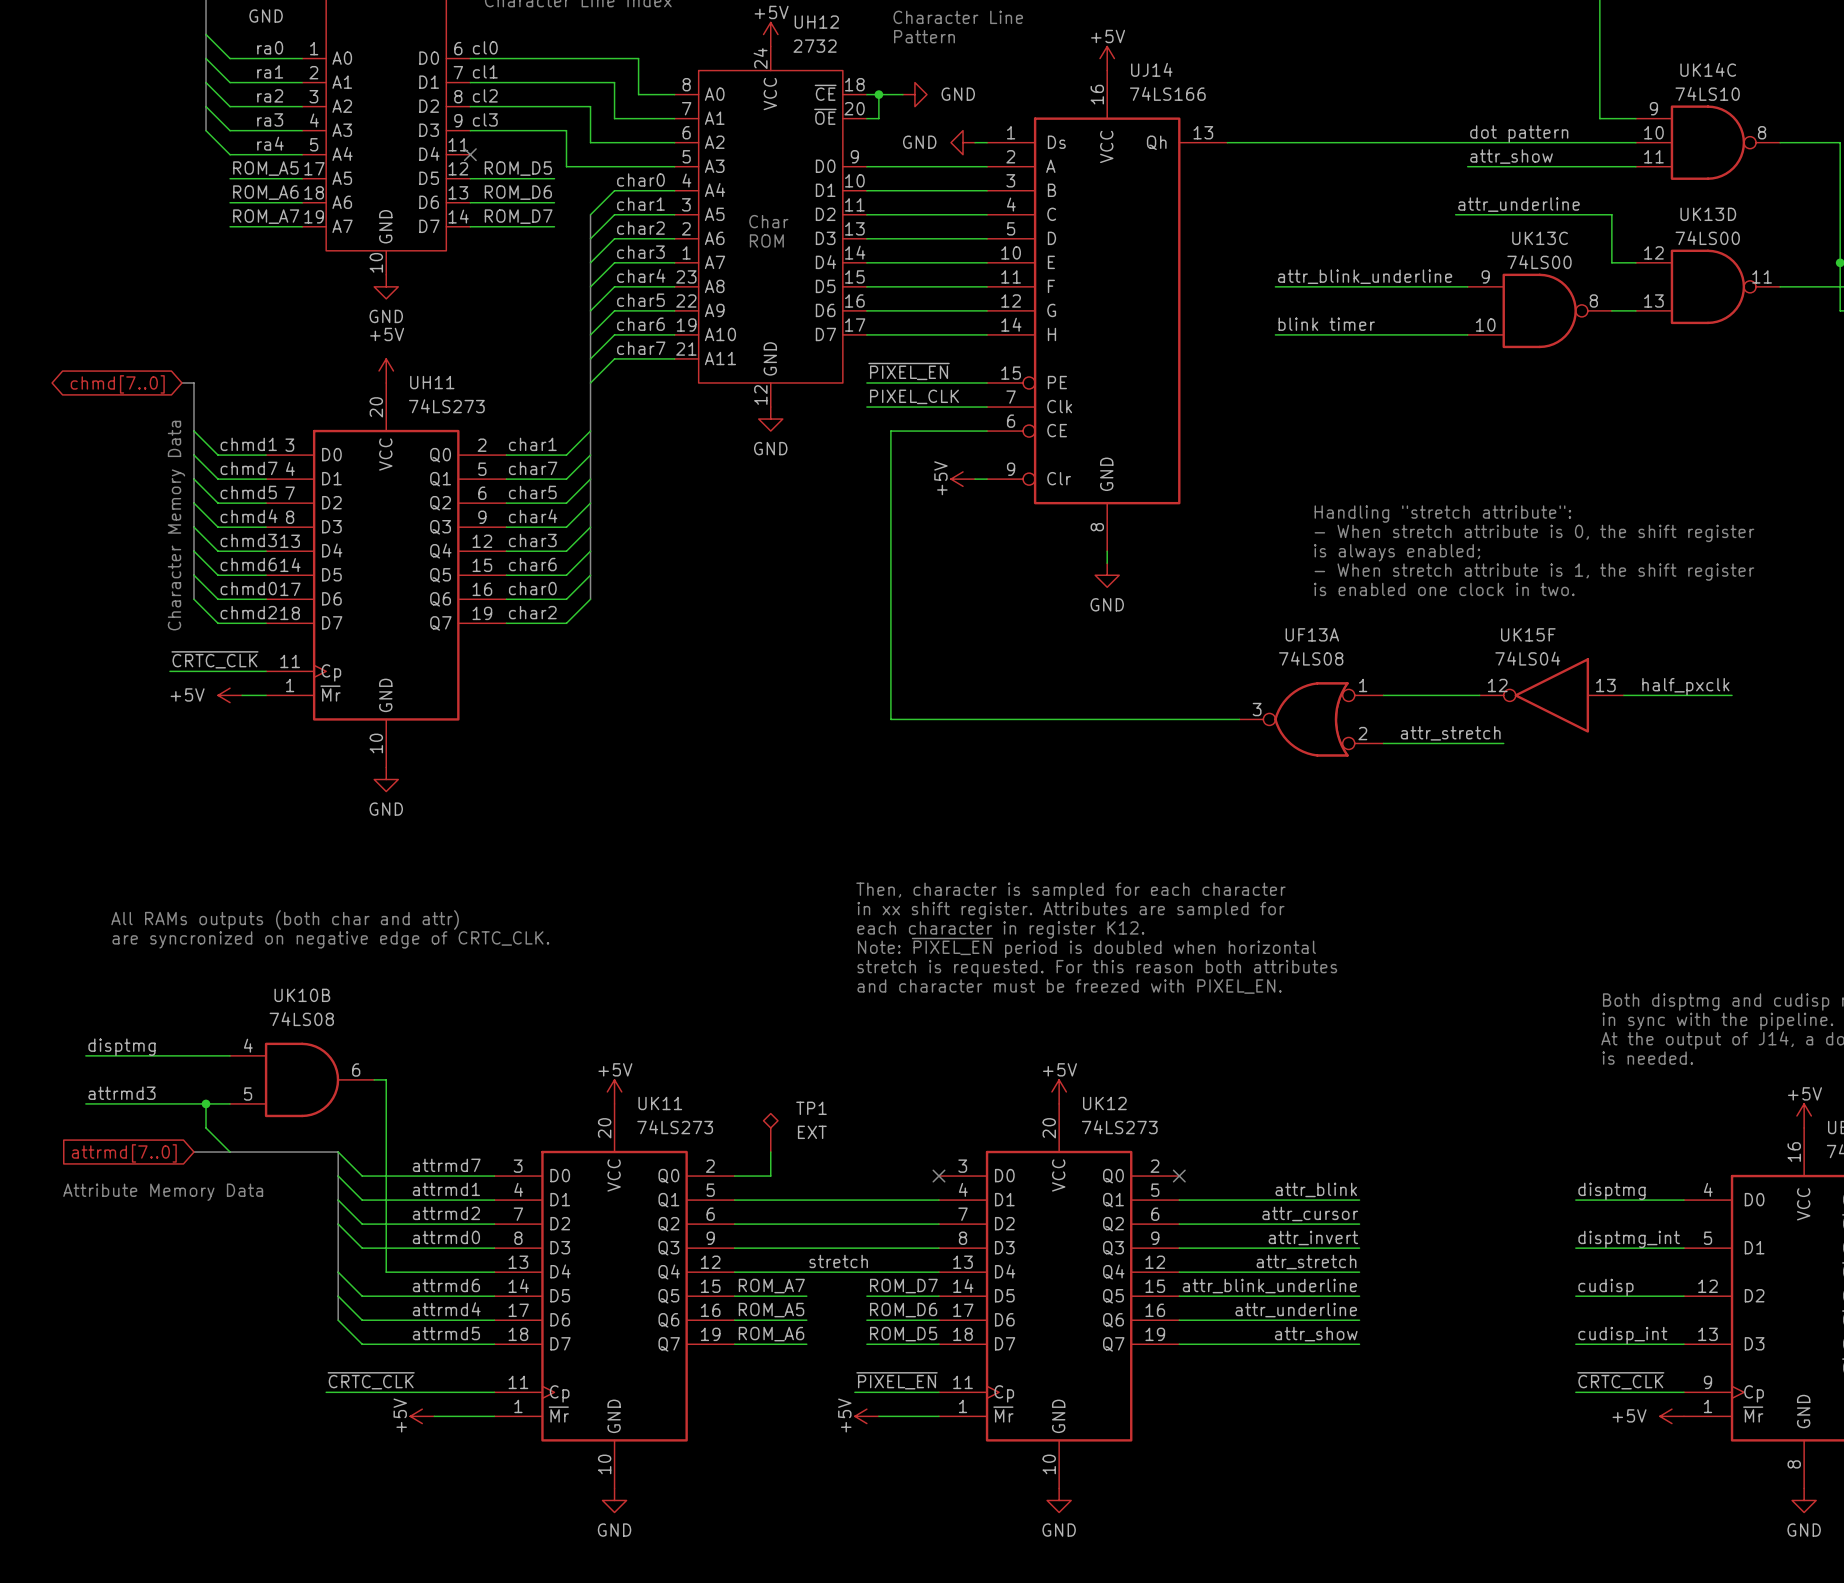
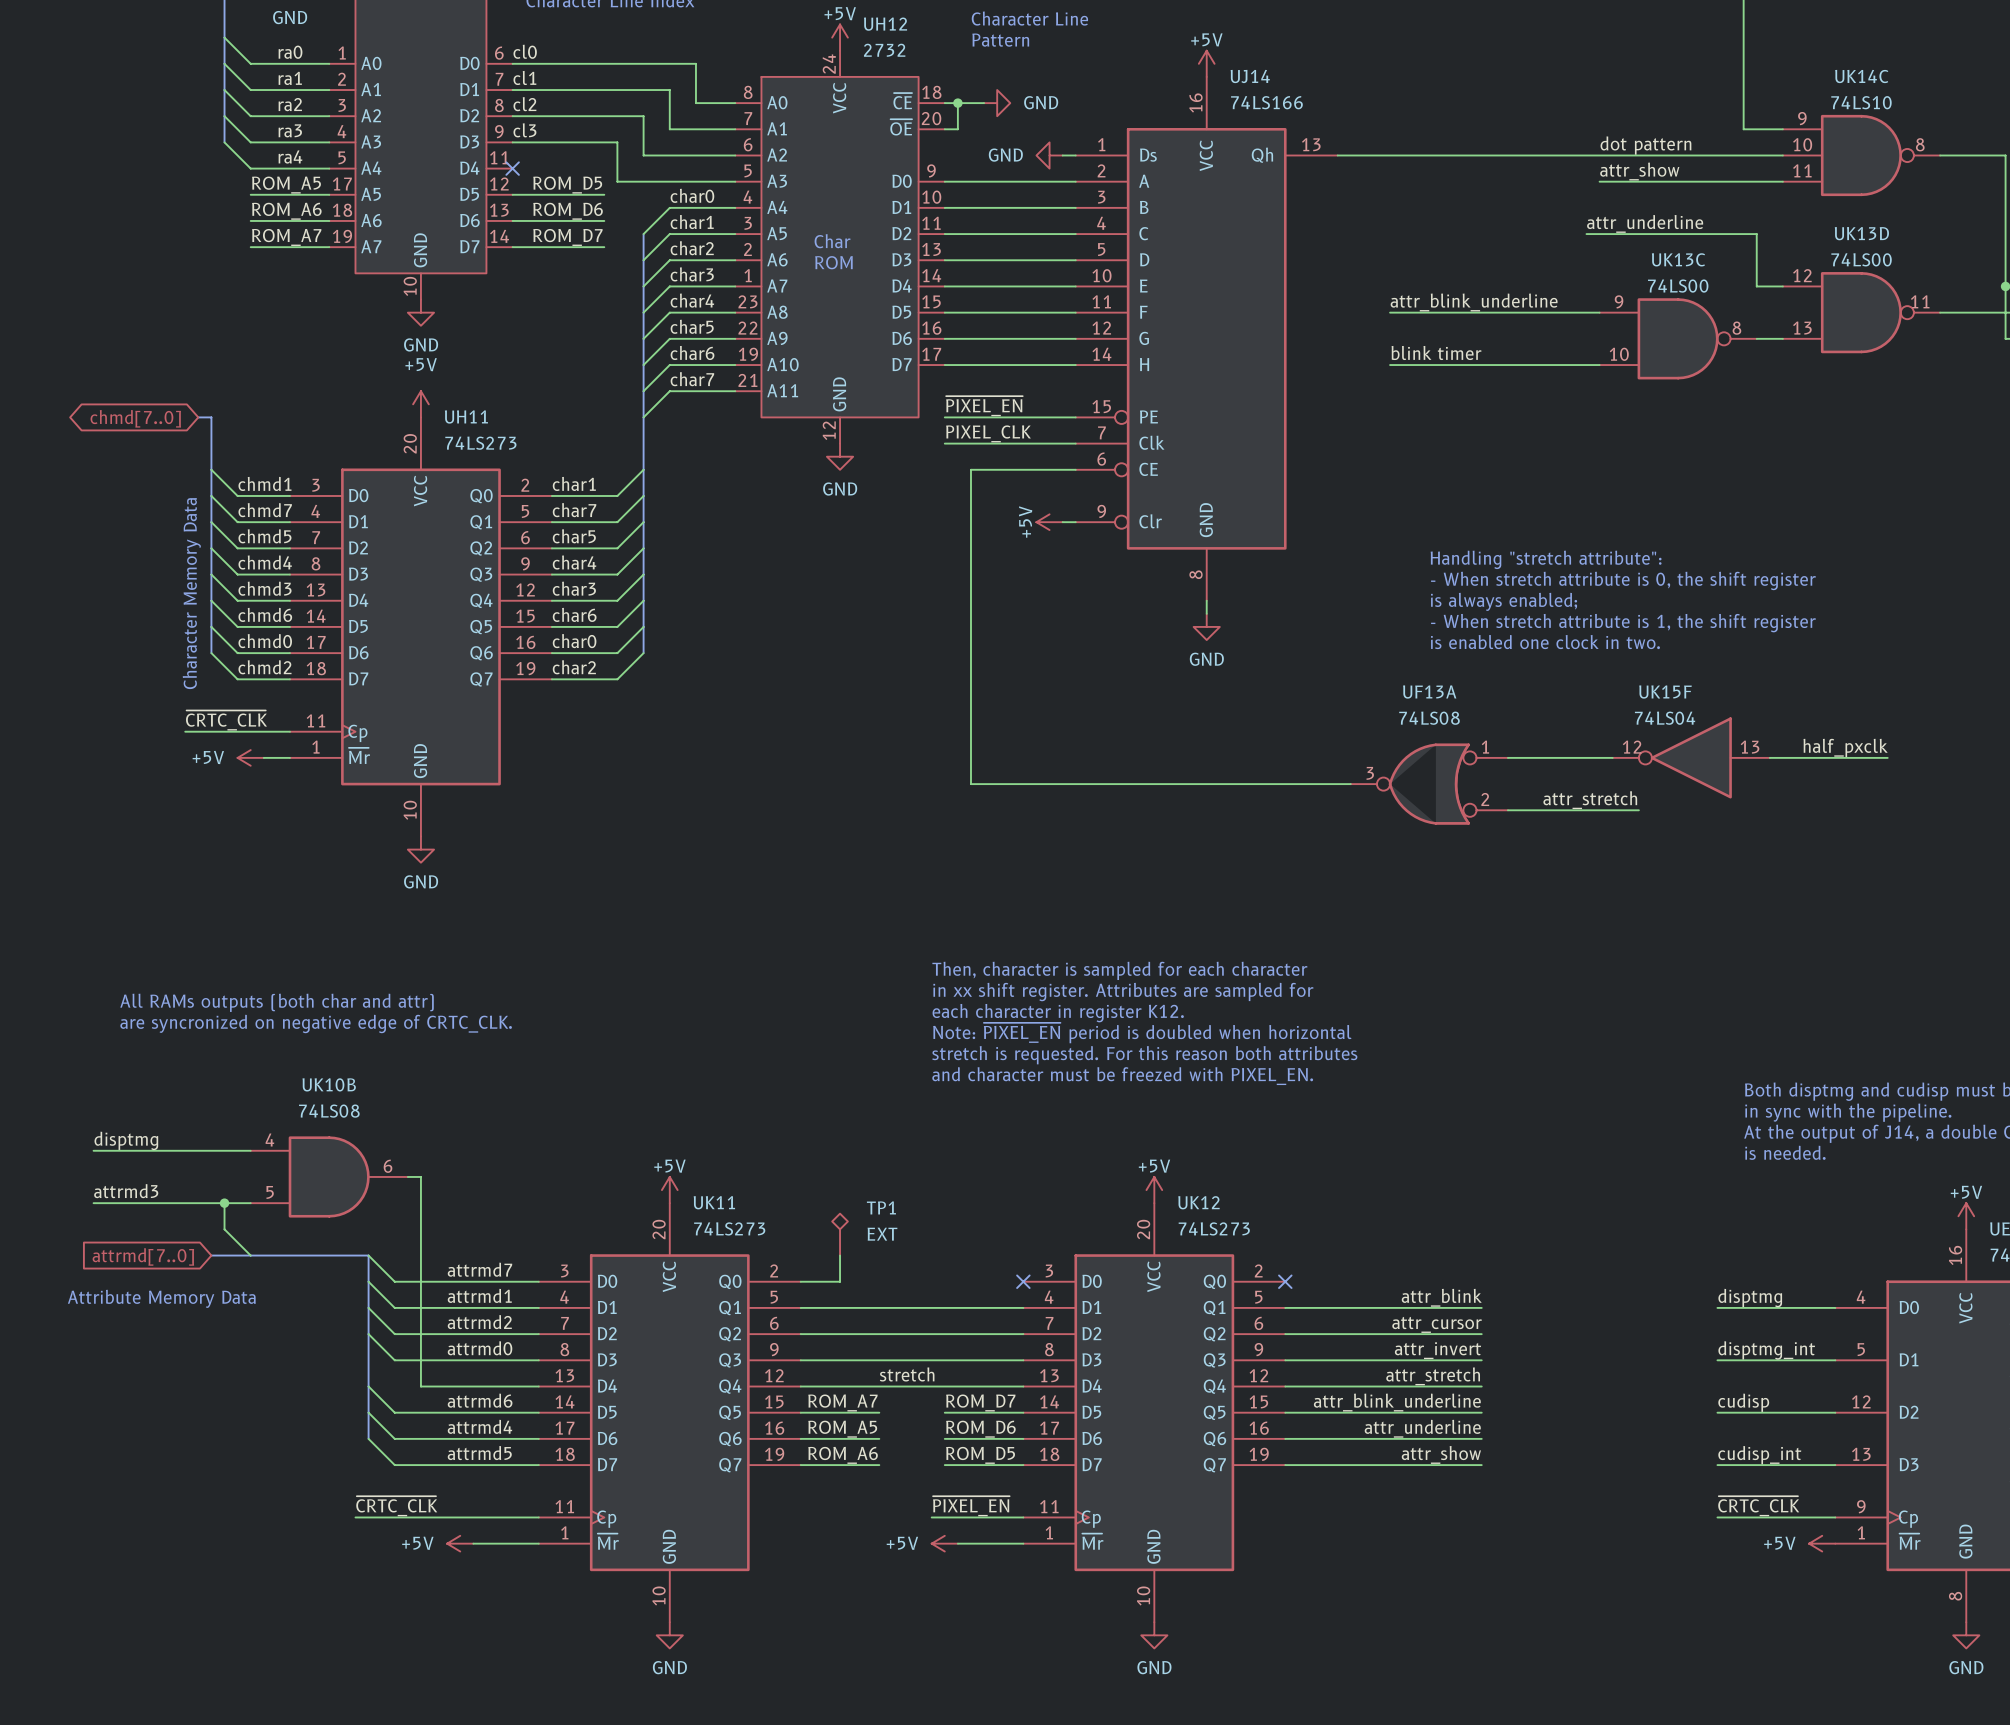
power symbol text rotation: 0° (400, 1415) -> 90° clockwise (417, 1543)
power symbol text rotation: 0° (844, 1415) -> 90° clockwise (902, 1543)

